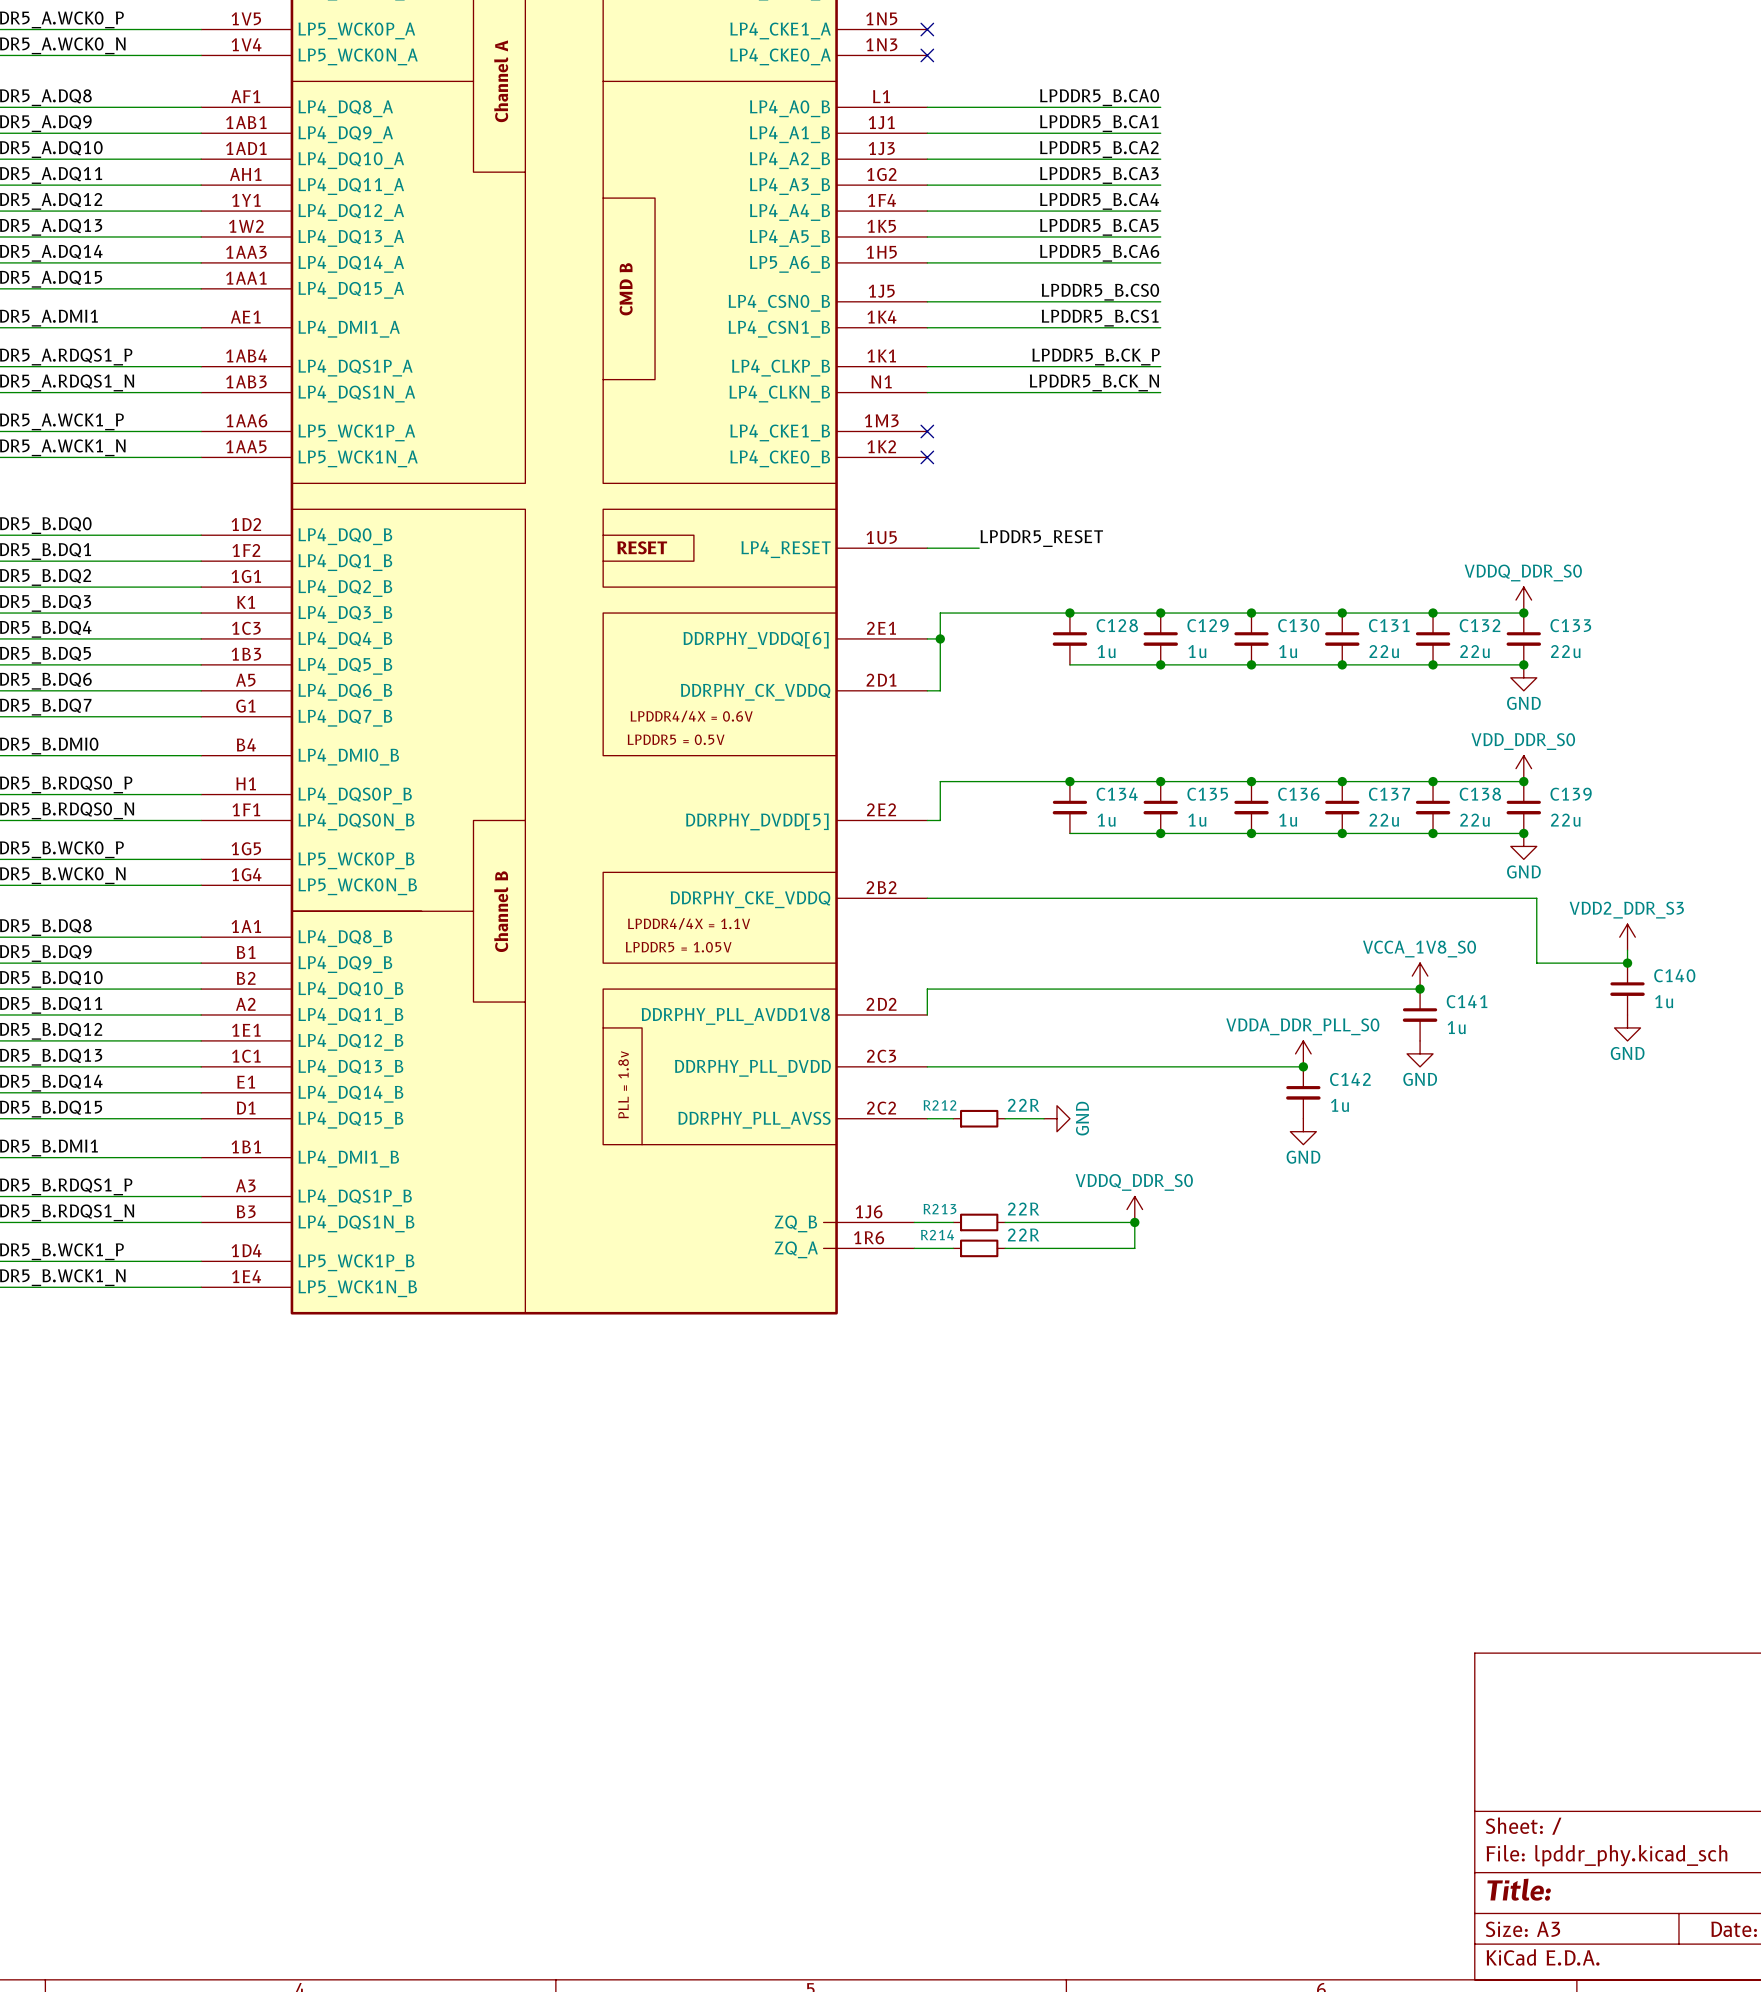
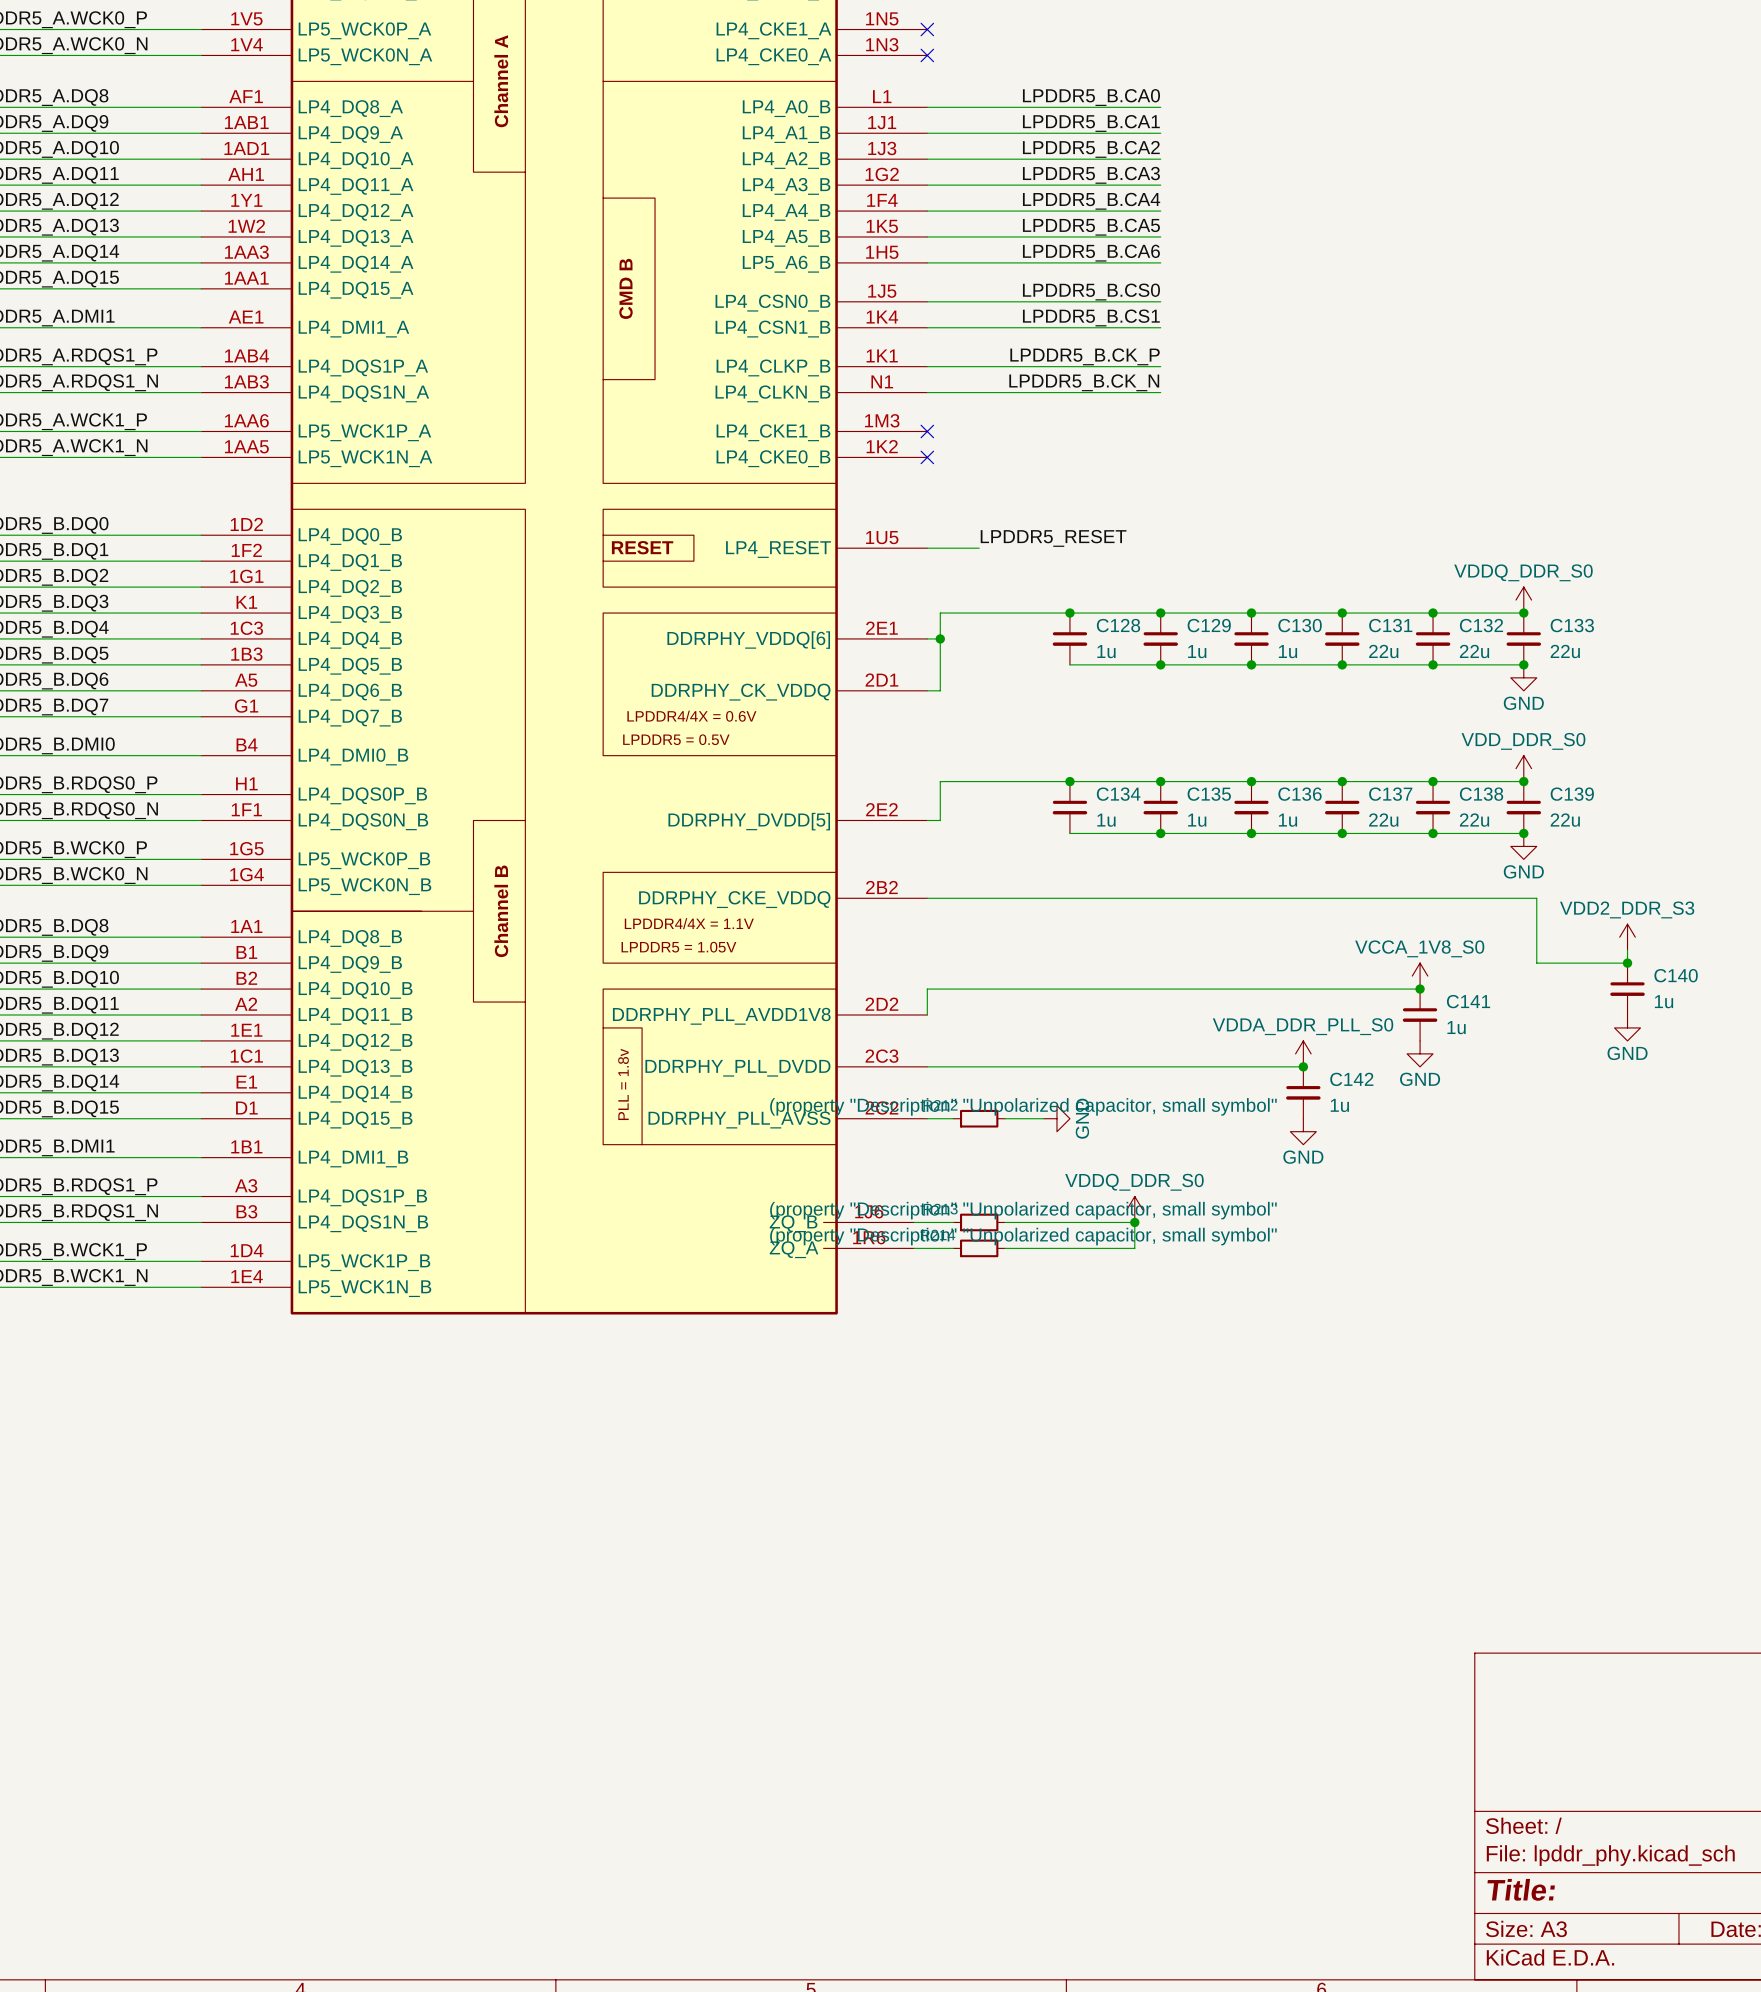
R212 value: 22R (1023, 1105) -> (property "Description" "Unpolarized capacitor, small symbol" (1023, 1106)
R213 value: 22R (1023, 1209) -> (property "Description" "Unpolarized capacitor, small symbol" (1023, 1210)
R214 value: 22R (1023, 1234) -> (property "Description" "Unpolarized capacitor, small symbol" (1023, 1236)

